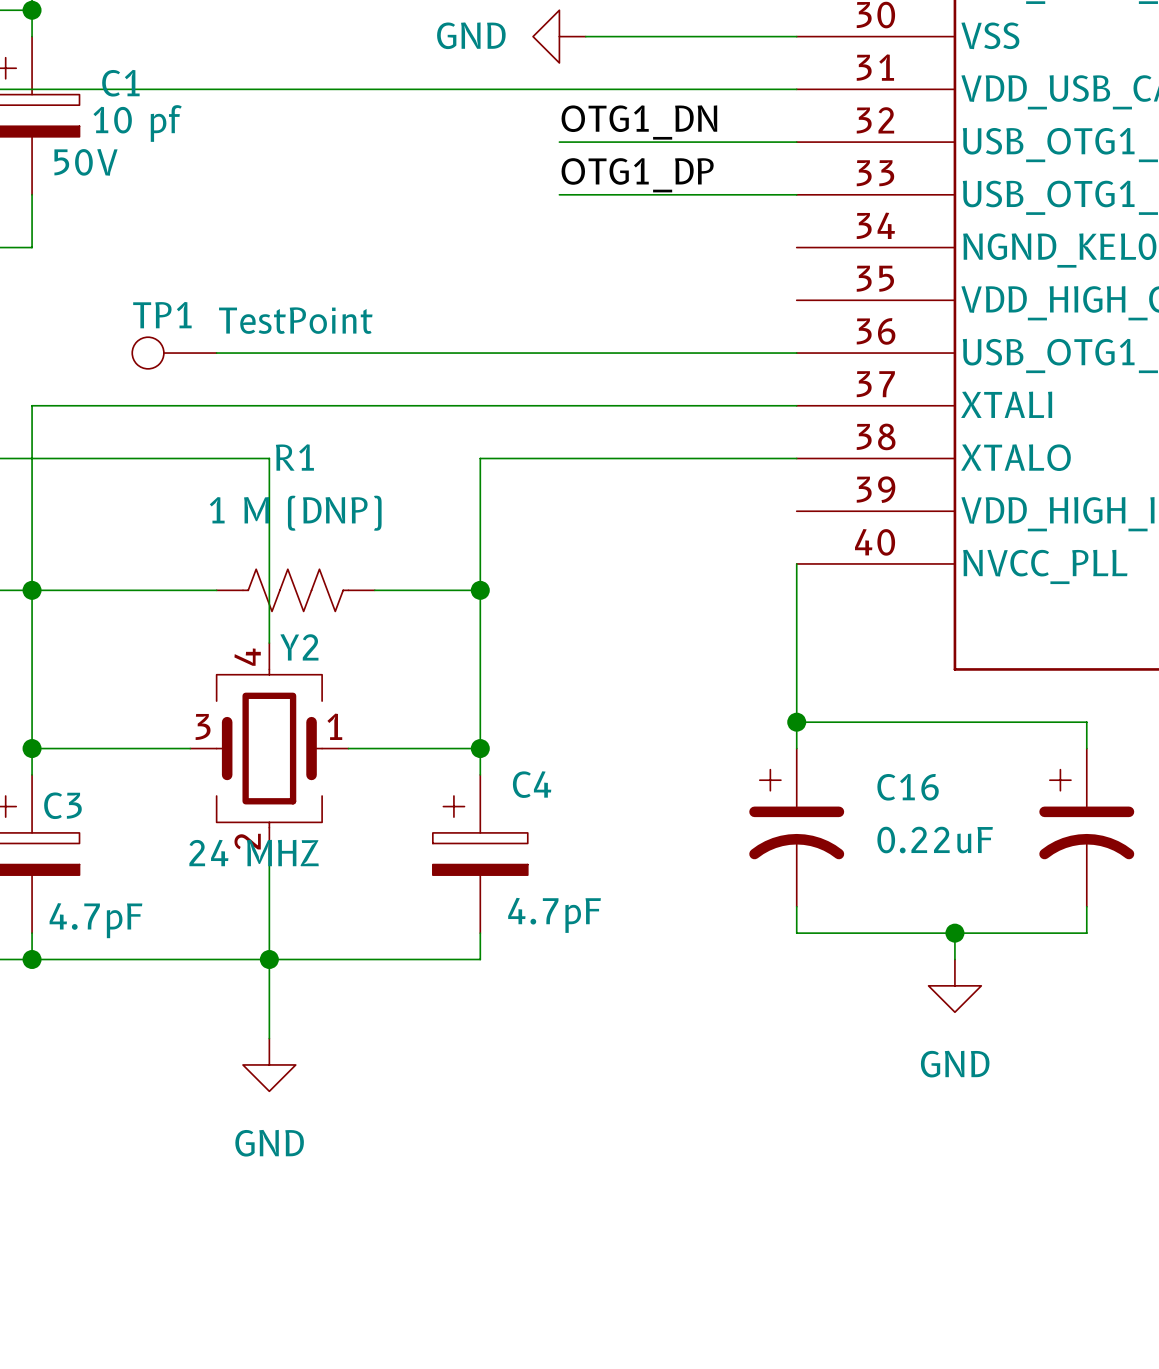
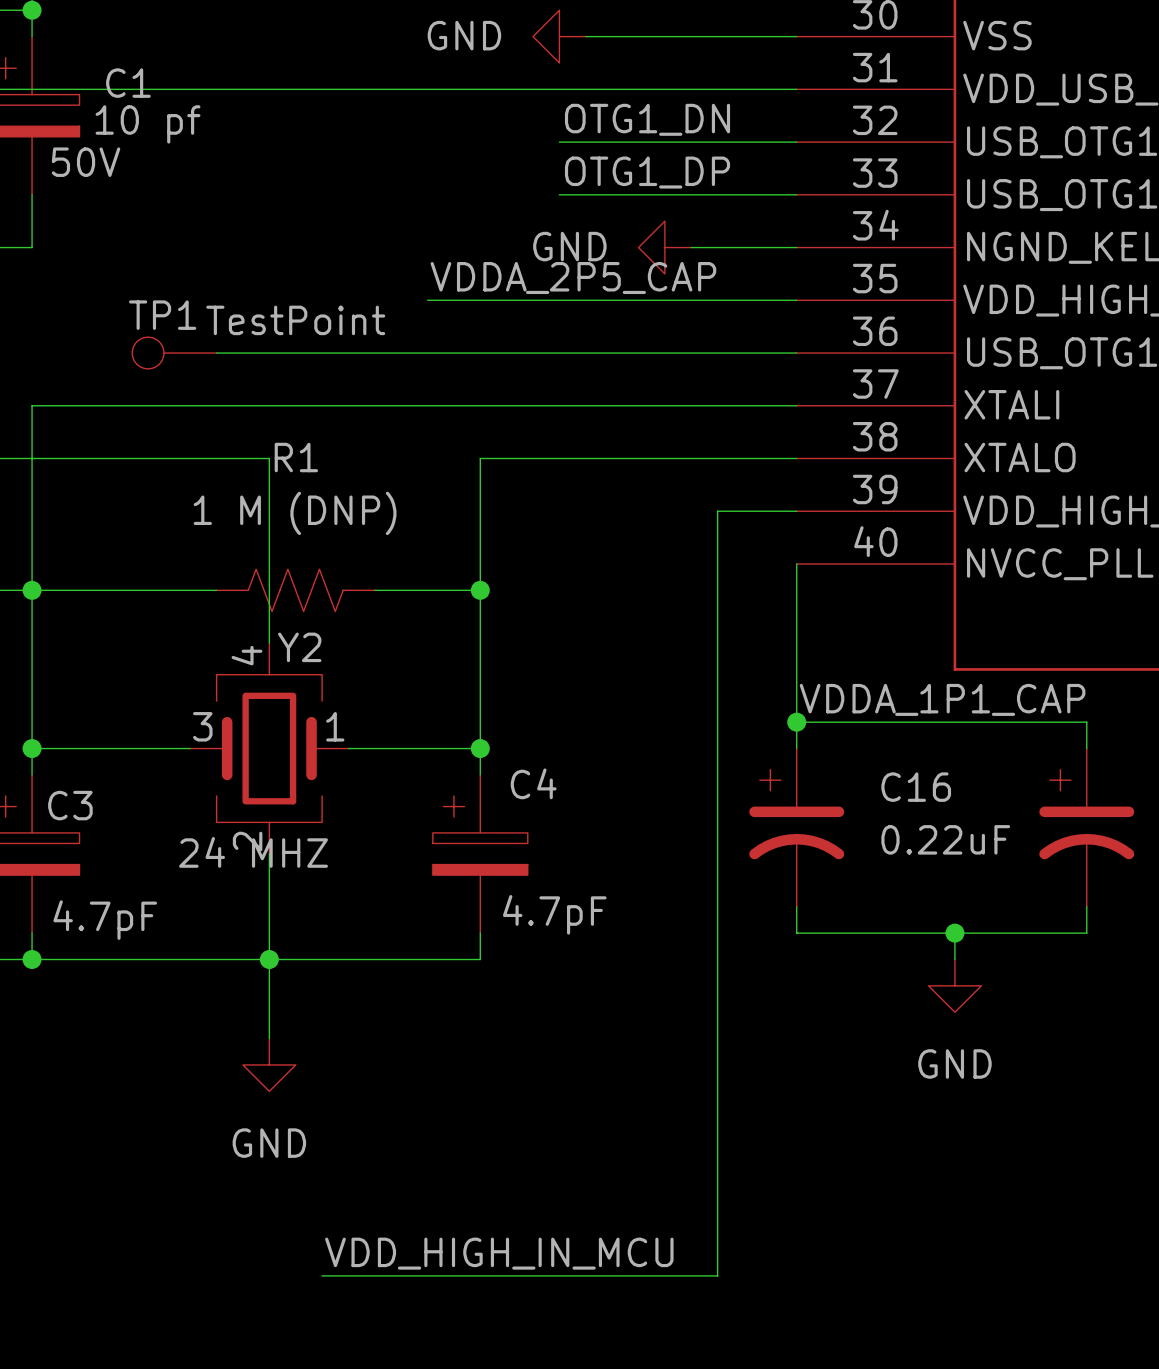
power symbol: none -> GND (664, 247)
wire: none -> (691, 247) (796, 247)
label: none -> VDDA_2P5_CAP (573, 278)
wire: none -> (427, 300) (796, 300)
wire: none -> (796, 511) (717, 511) (717, 1275) (322, 1275)
label: none -> VDDA_1P1_CAP (942, 699)
label: none -> VDD_HIGH_IN_MCU (499, 1253)

